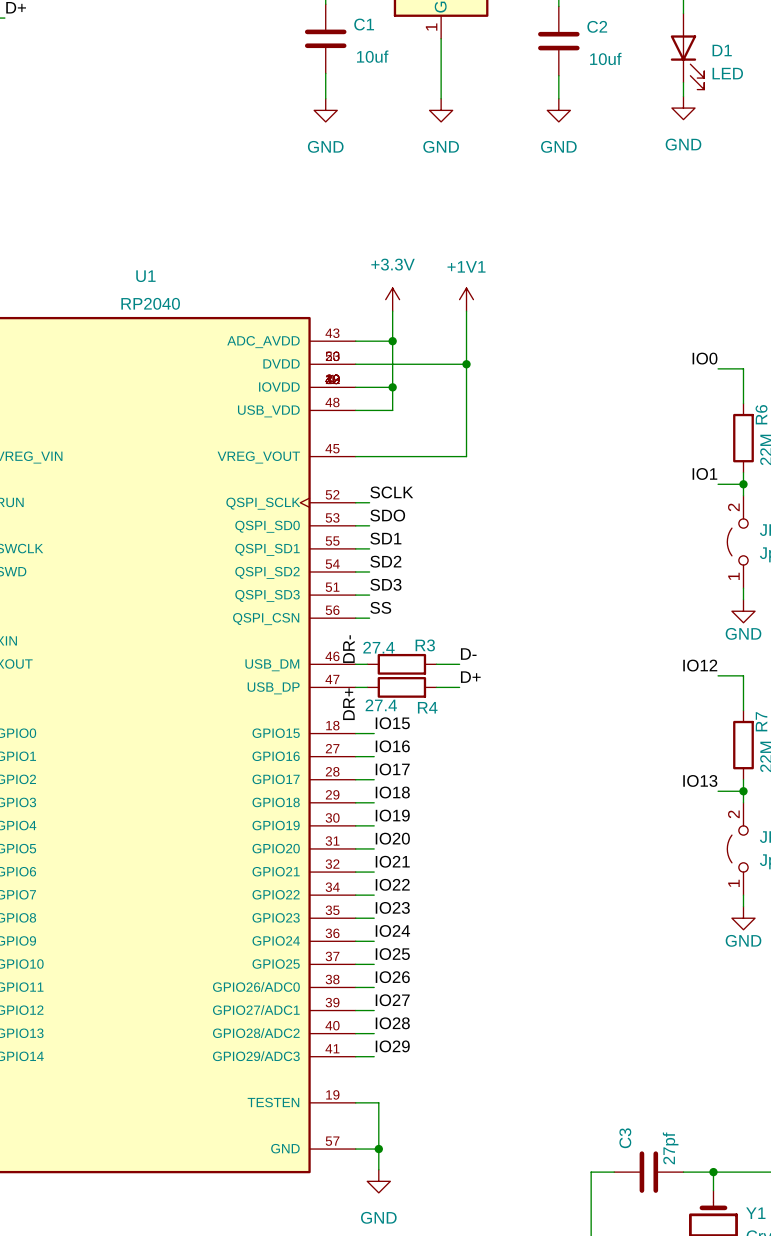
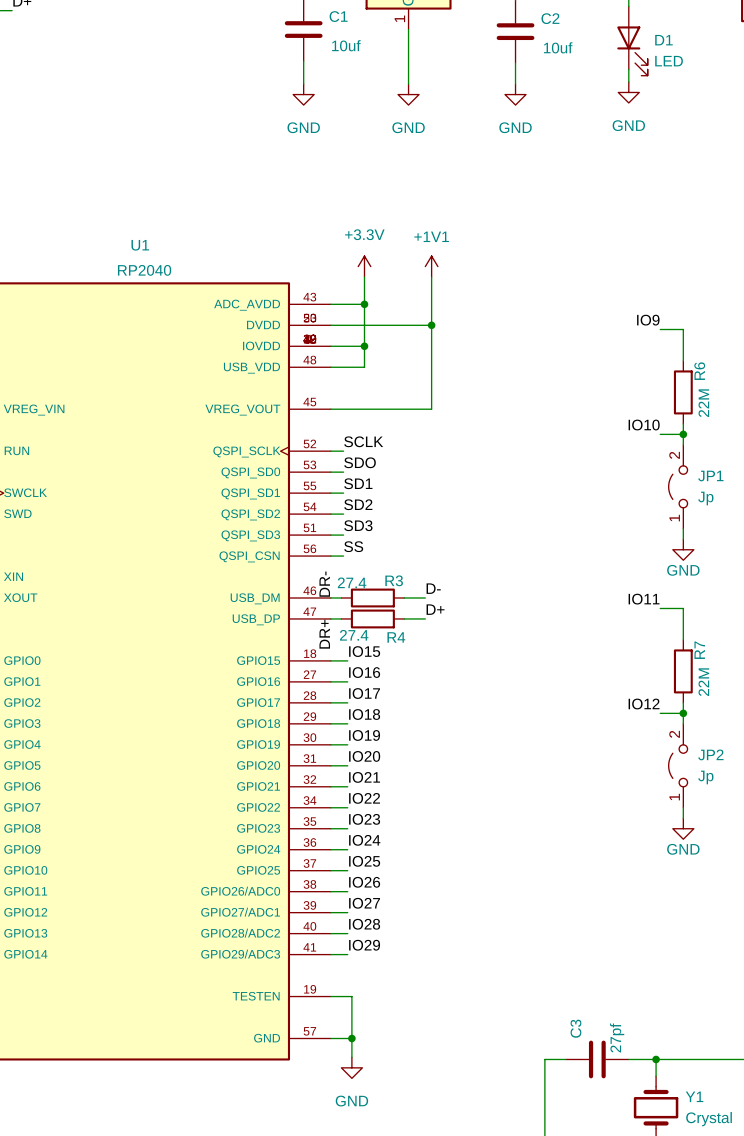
label: IO0 (705, 358) -> IO9 (648, 320)
label: IO1 (704, 473) -> IO10 (644, 425)
label: IO12 (700, 665) -> IO11 (644, 599)
label: IO13 (700, 780) -> IO12 (644, 704)

